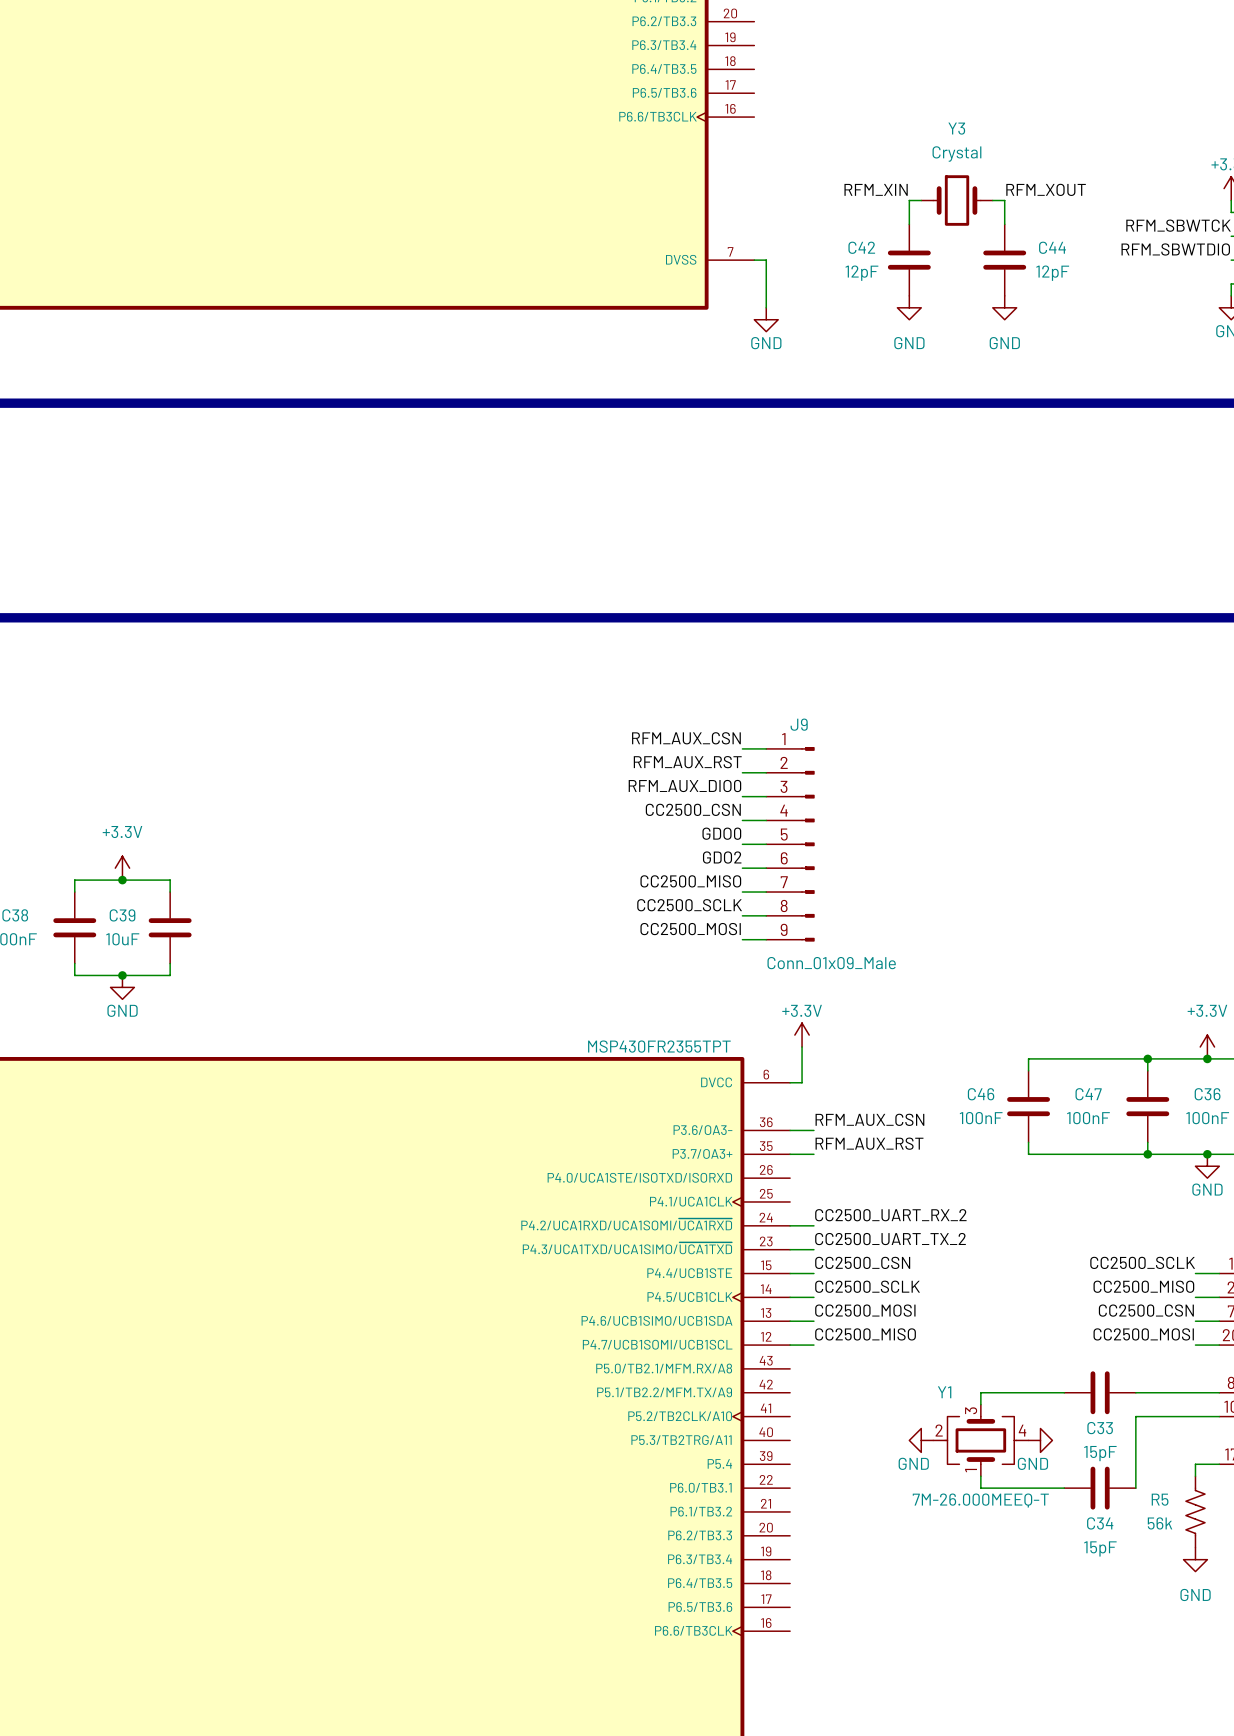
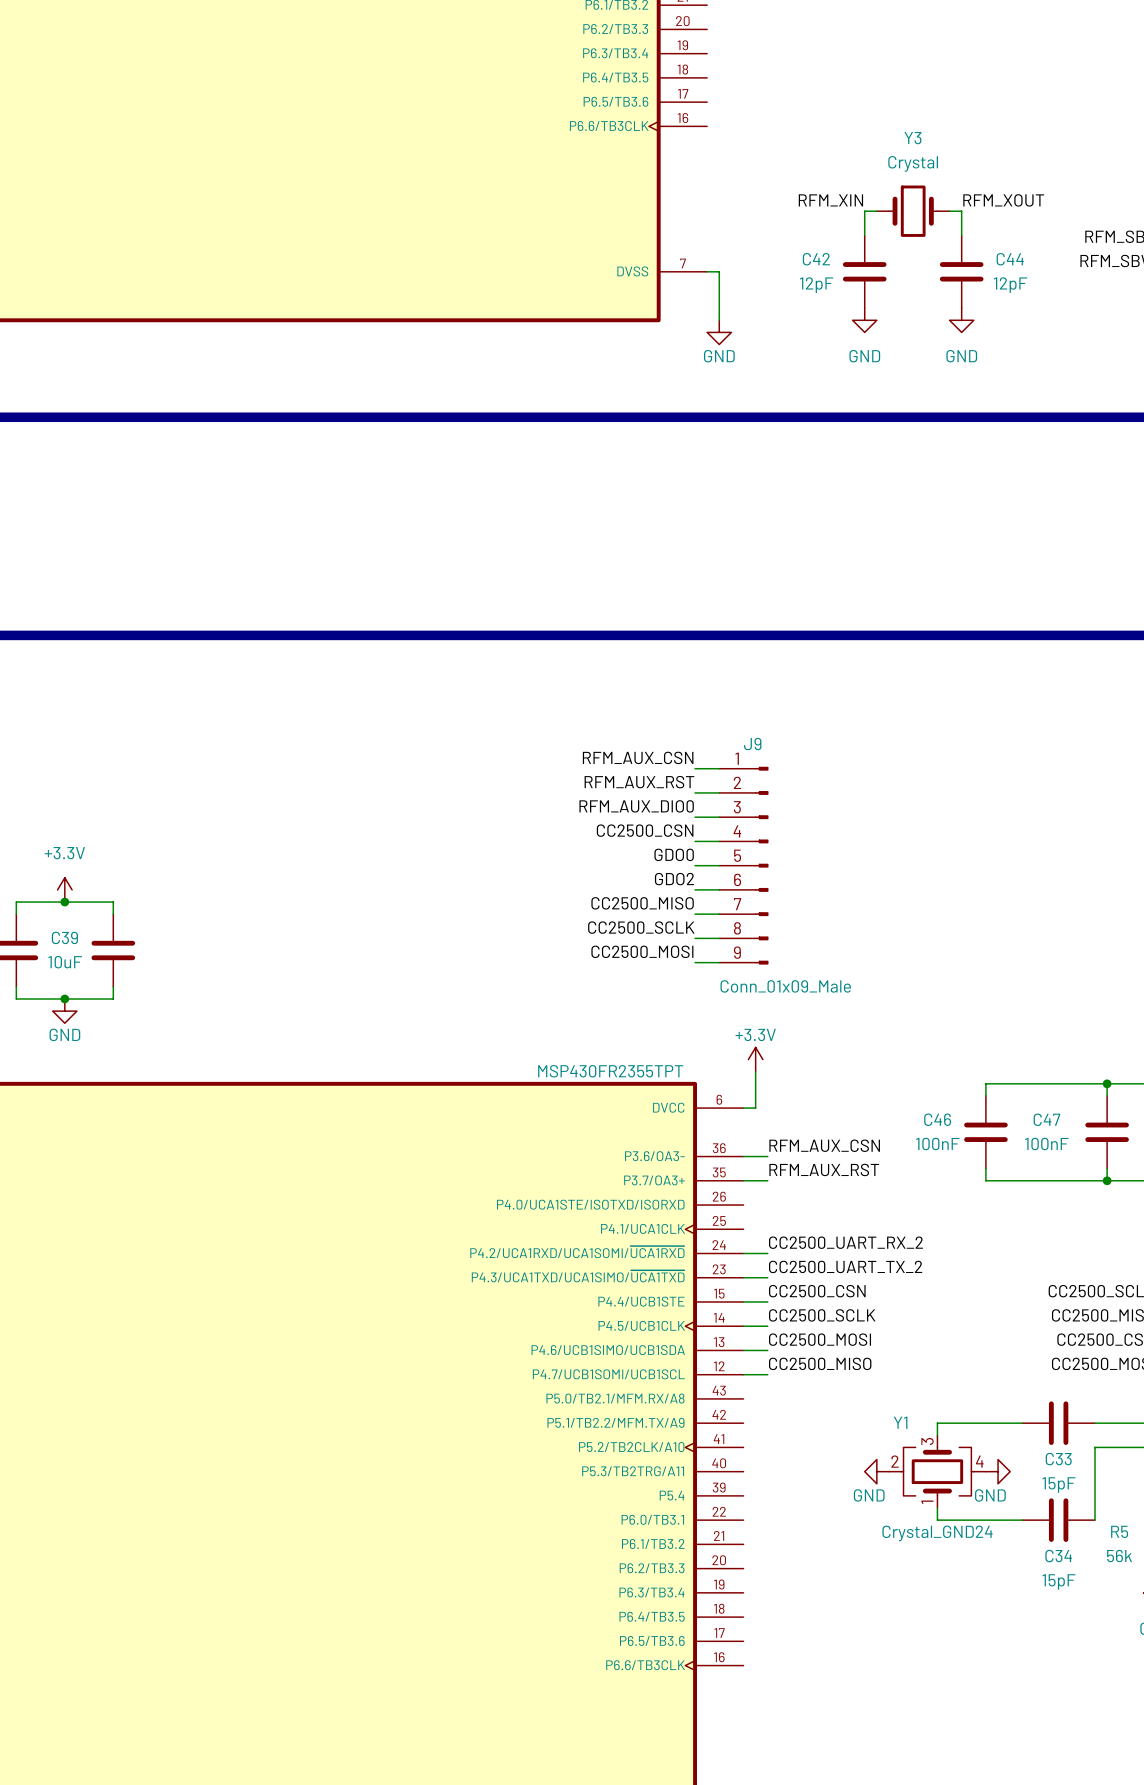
Y1 value: 7M-26.000MEEQ-T (980, 1500) -> Crystal_GND24 (937, 1533)

